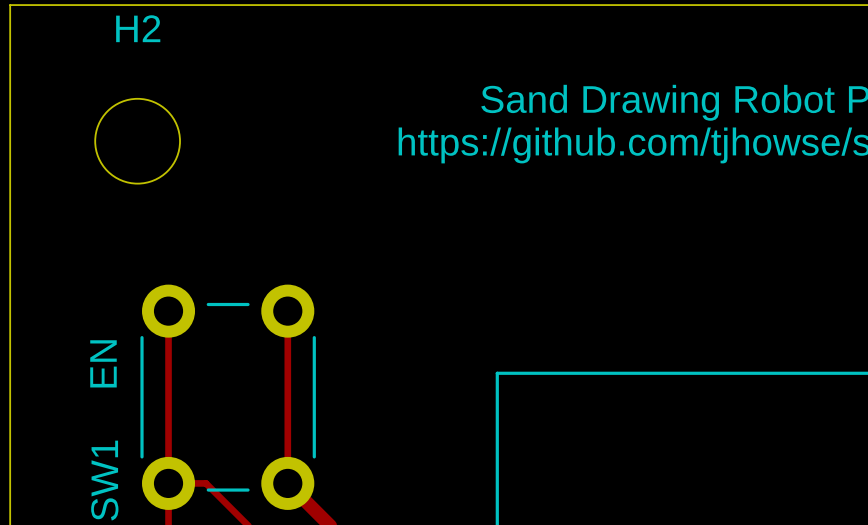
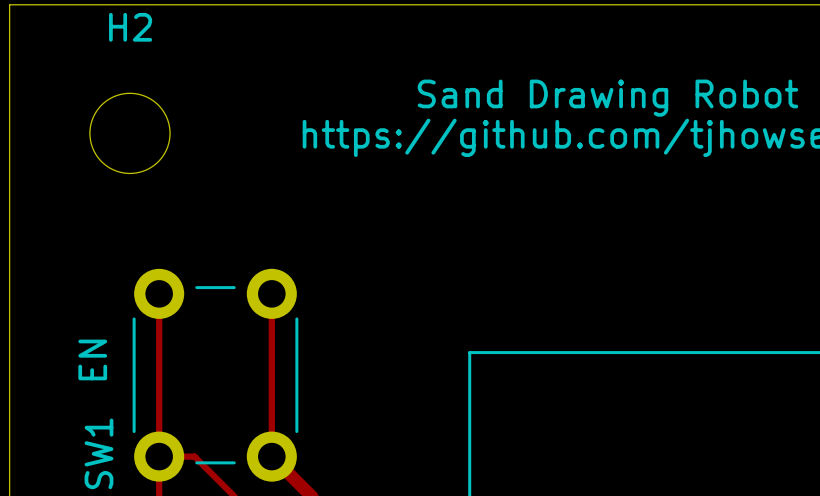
text position: EN (103, 363) -> EN (92, 359)

